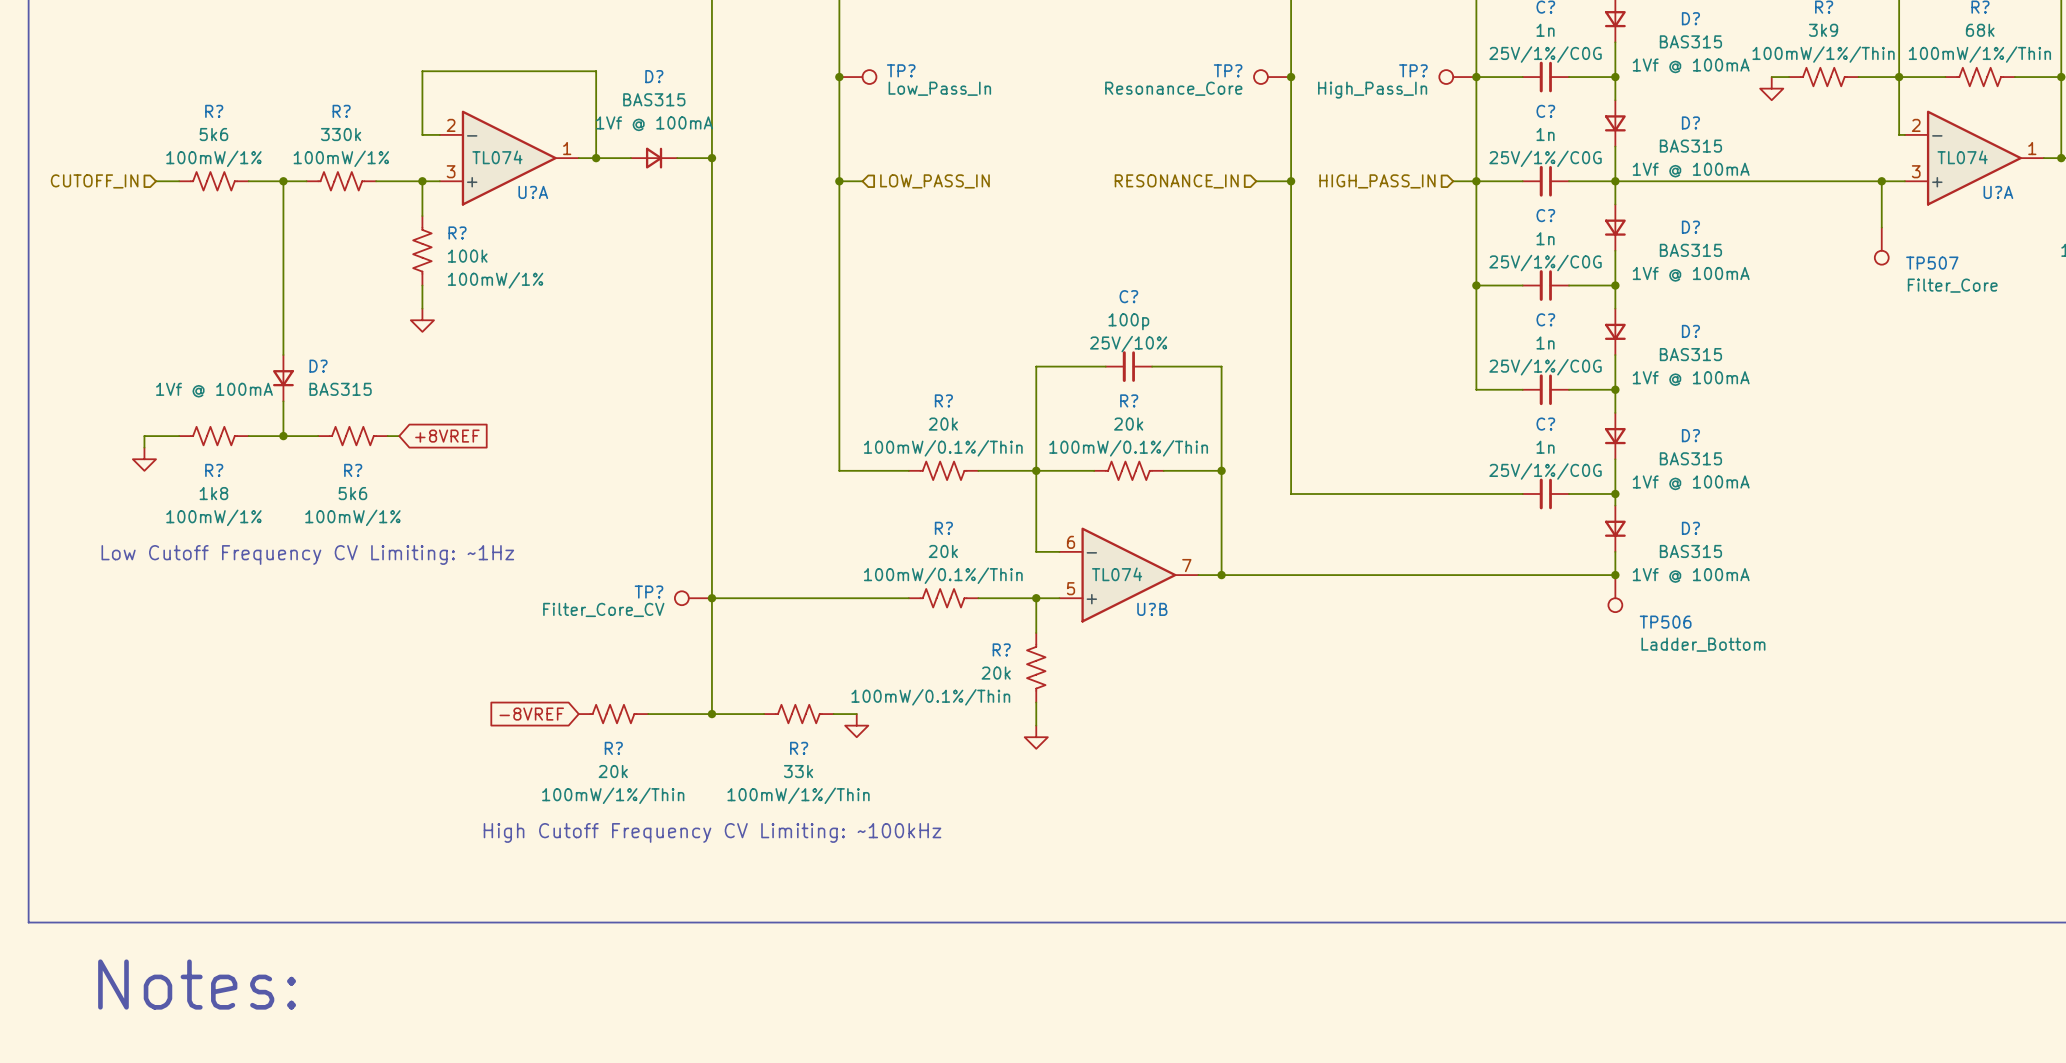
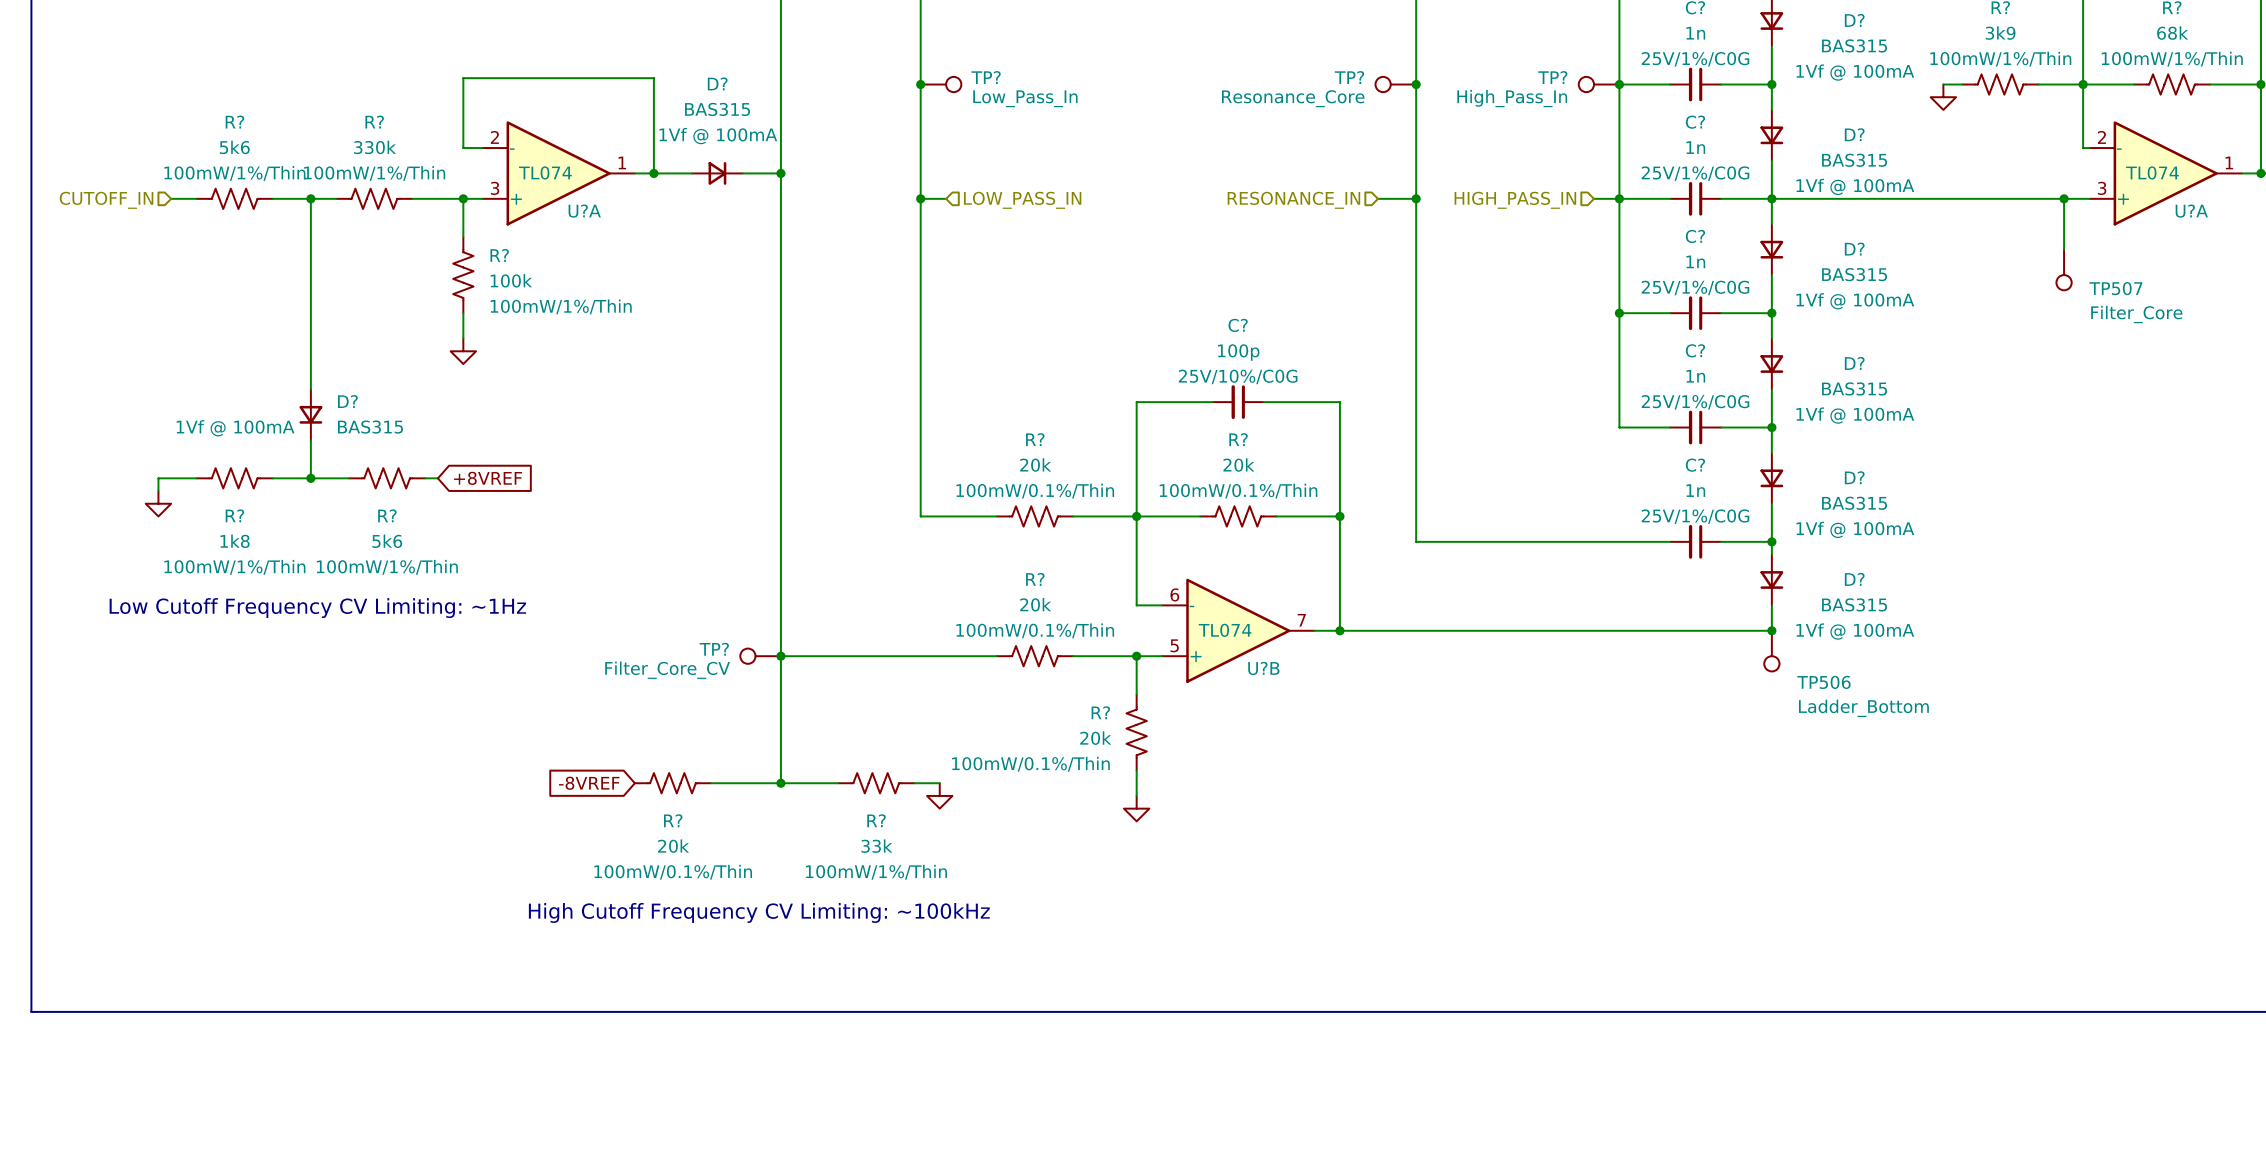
R? text: 100mW/1% (213, 158) -> 100mW/1%/Thin (234, 173)
R? text: 100mW/1% (341, 158) -> 100mW/1%/Thin (374, 173)
R? text: 100mW/1% (495, 280) -> 100mW/1%/Thin (561, 306)
C? text: 25V/10% (1128, 344) -> 25V/10%/C0G (1238, 376)
R? text: 100mW/1% (213, 517) -> 100mW/1%/Thin (234, 567)
R? text: 100mW/1% (352, 517) -> 100mW/1%/Thin (387, 567)
R? text: 100mW/1%/Thin (613, 795) -> 100mW/0.1%/Thin (673, 872)
text: Notes: (197, 984) -> none

